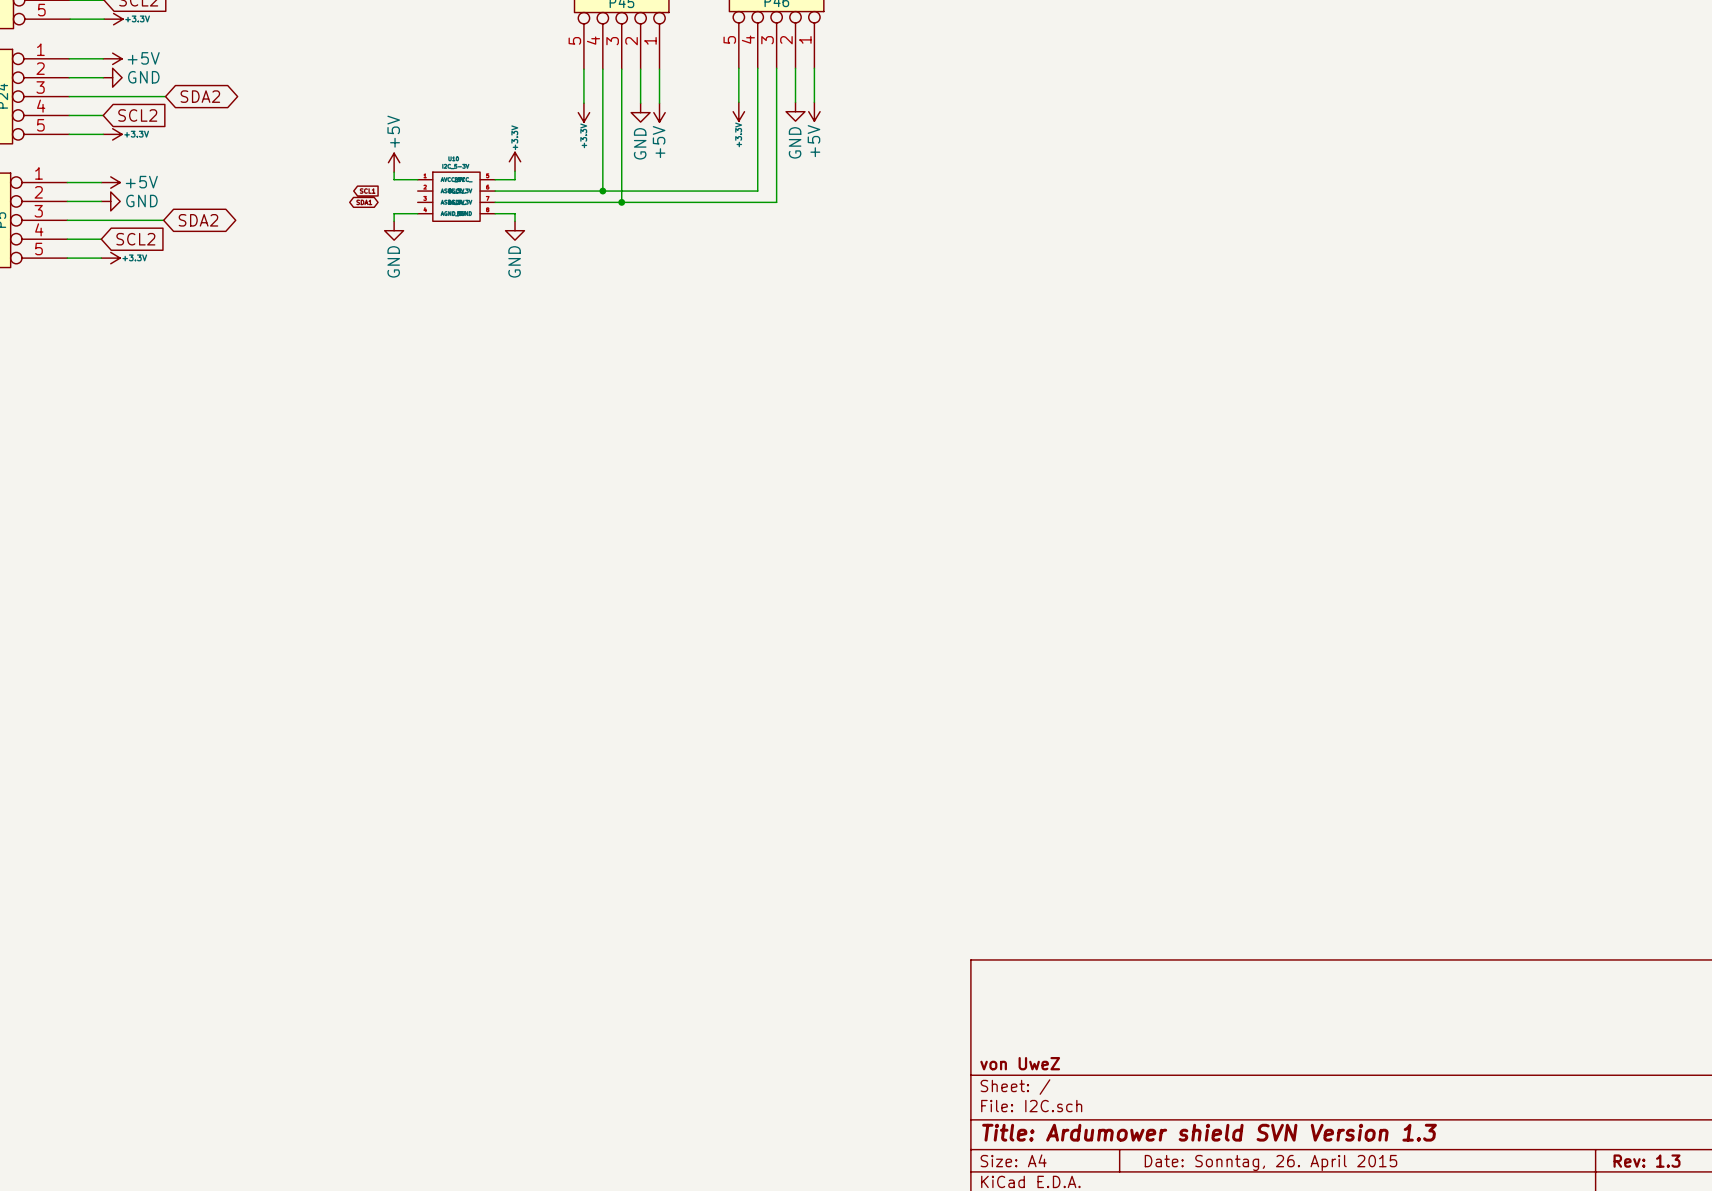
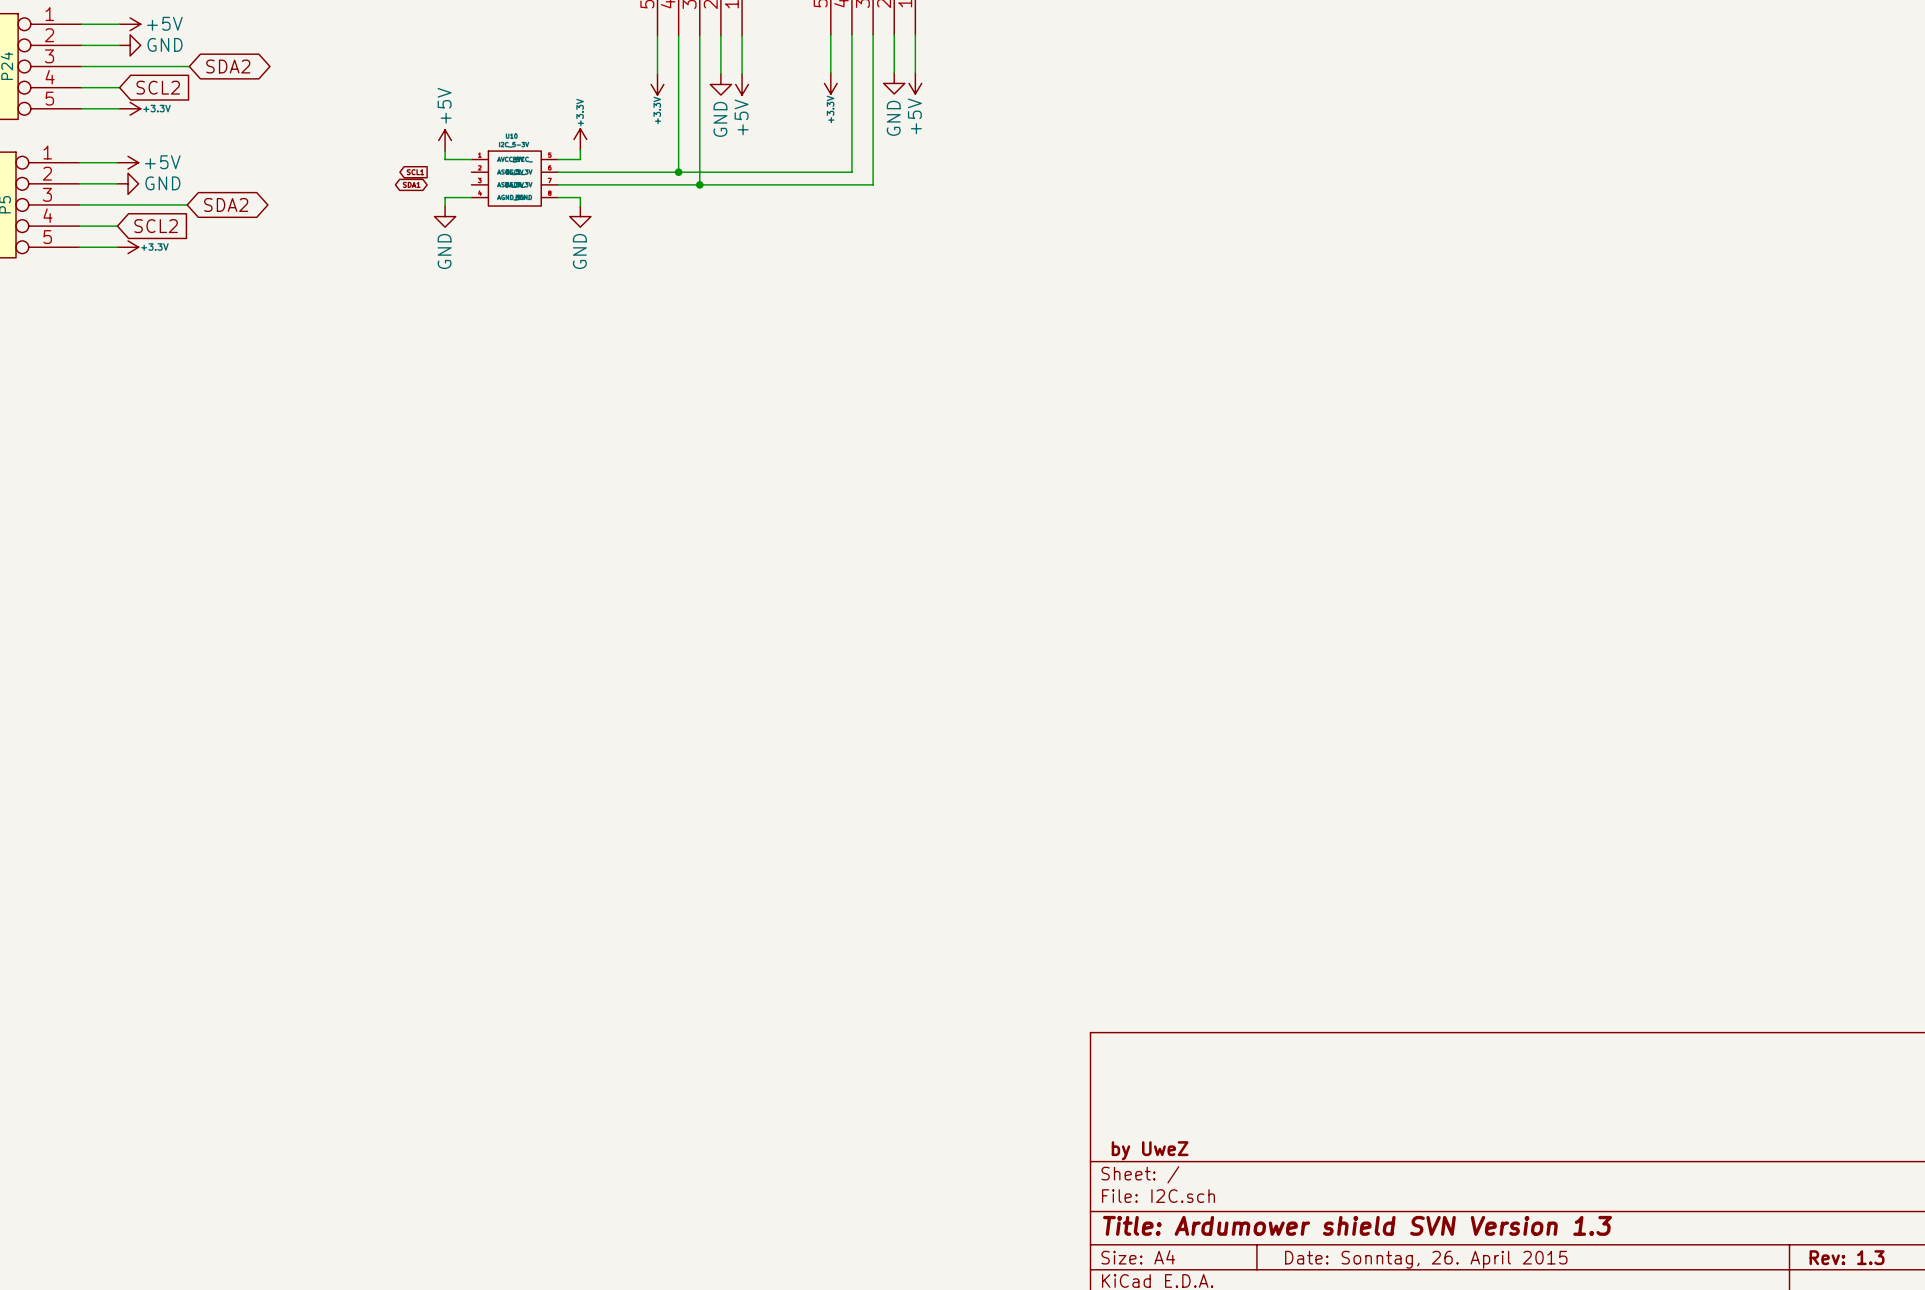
title block: von UweZ (1020, 1063) -> by UweZ (1150, 1150)

